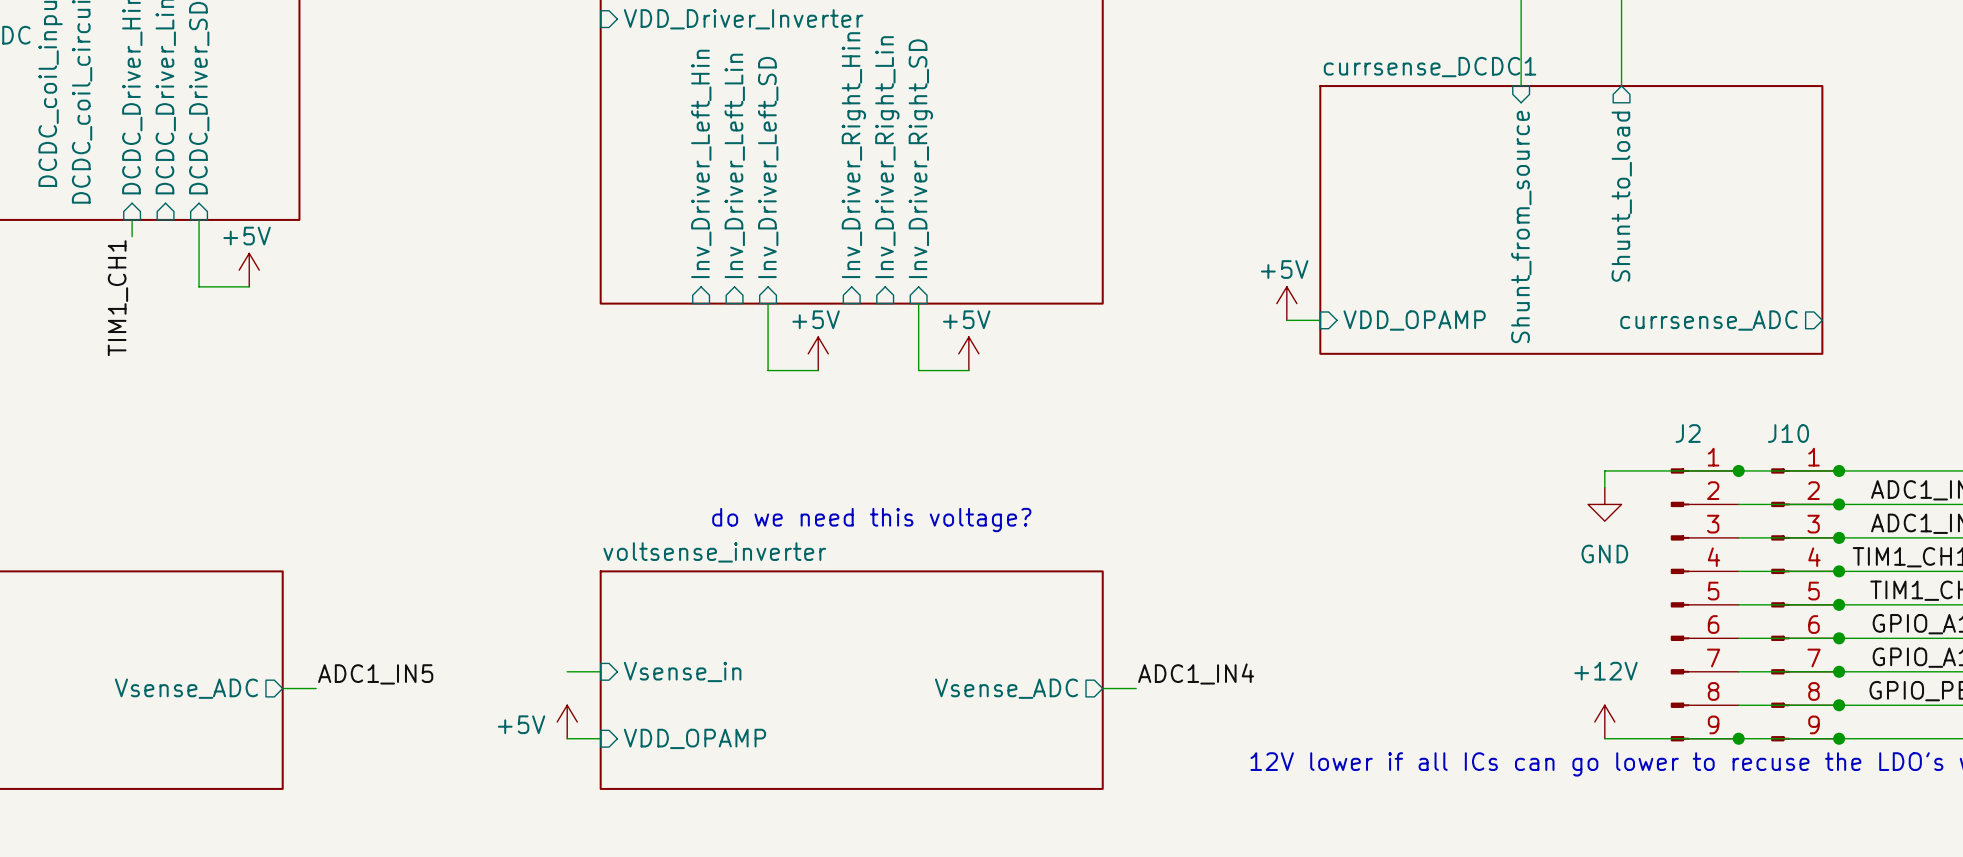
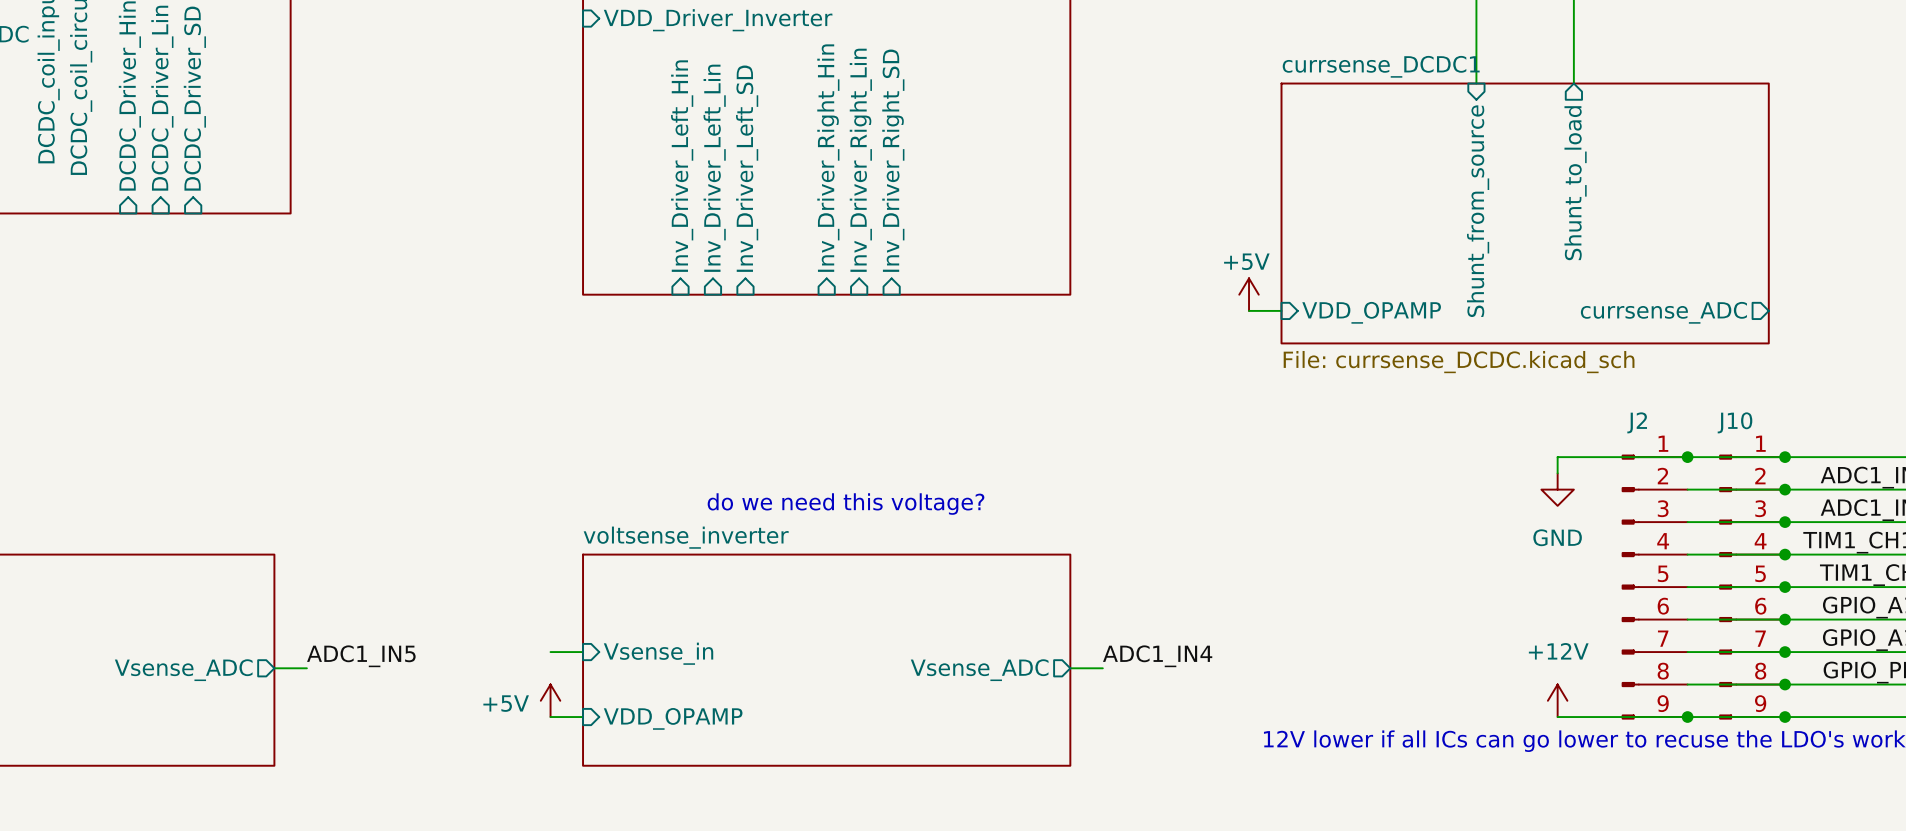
wire: (132, 219) (132, 236) -> none
wire: (199, 219) (199, 286) (249, 286) -> none
power symbol: +5V (249, 270) -> none
label: TIM1_CH1 (117, 298) -> none
wire: (768, 303) (768, 370) (818, 370) -> none
wire: (918, 303) (918, 370) (968, 370) -> none
power symbol: +5V (818, 353) -> none
power symbol: +5V (968, 353) -> none
sheet currsense_DCDC1 value: none -> File: currsense_DCDC.kicad_sch (1459, 362)

